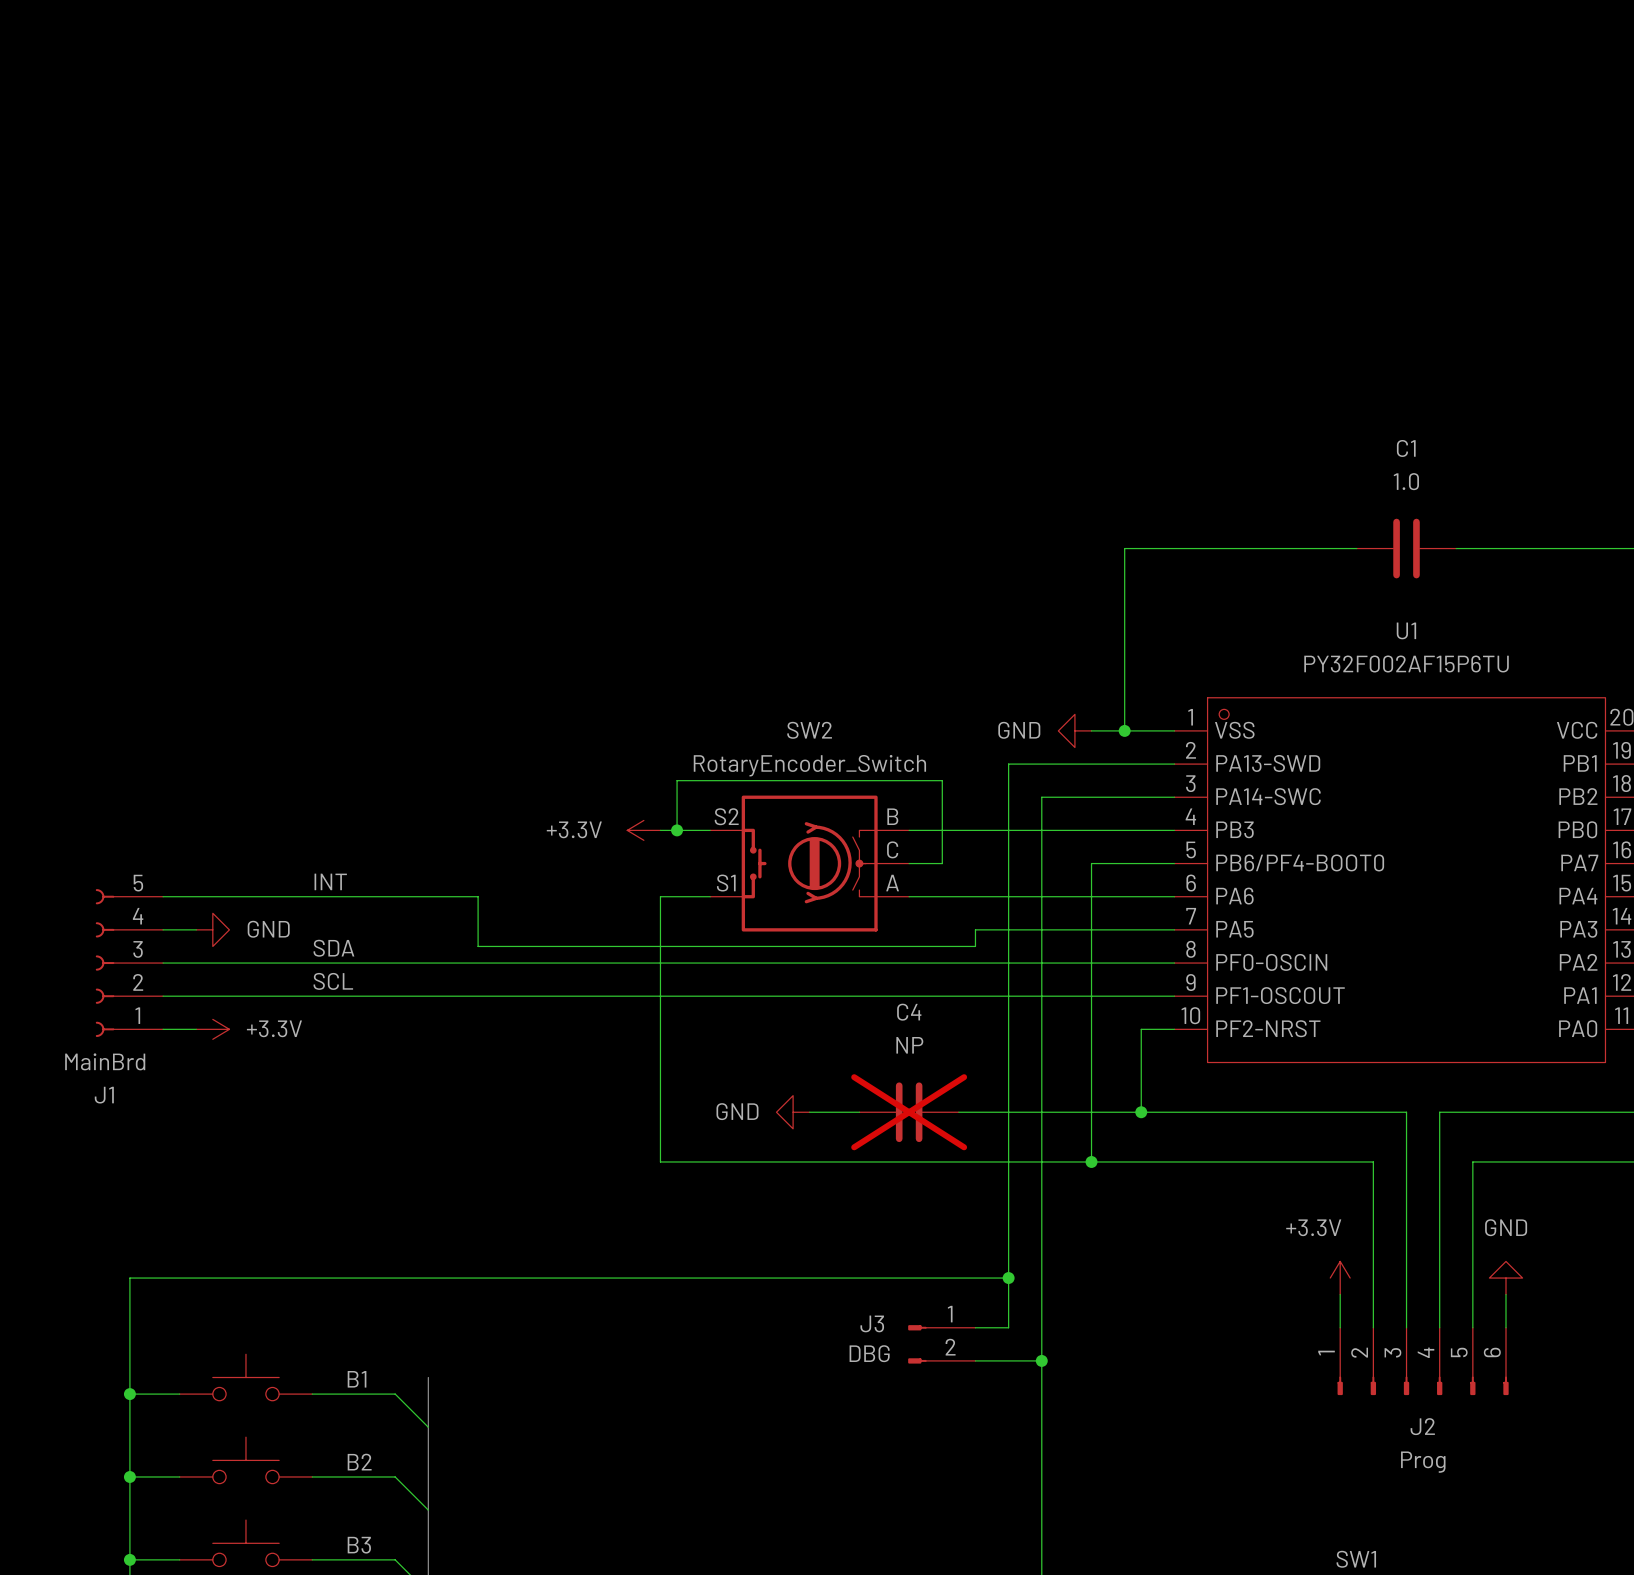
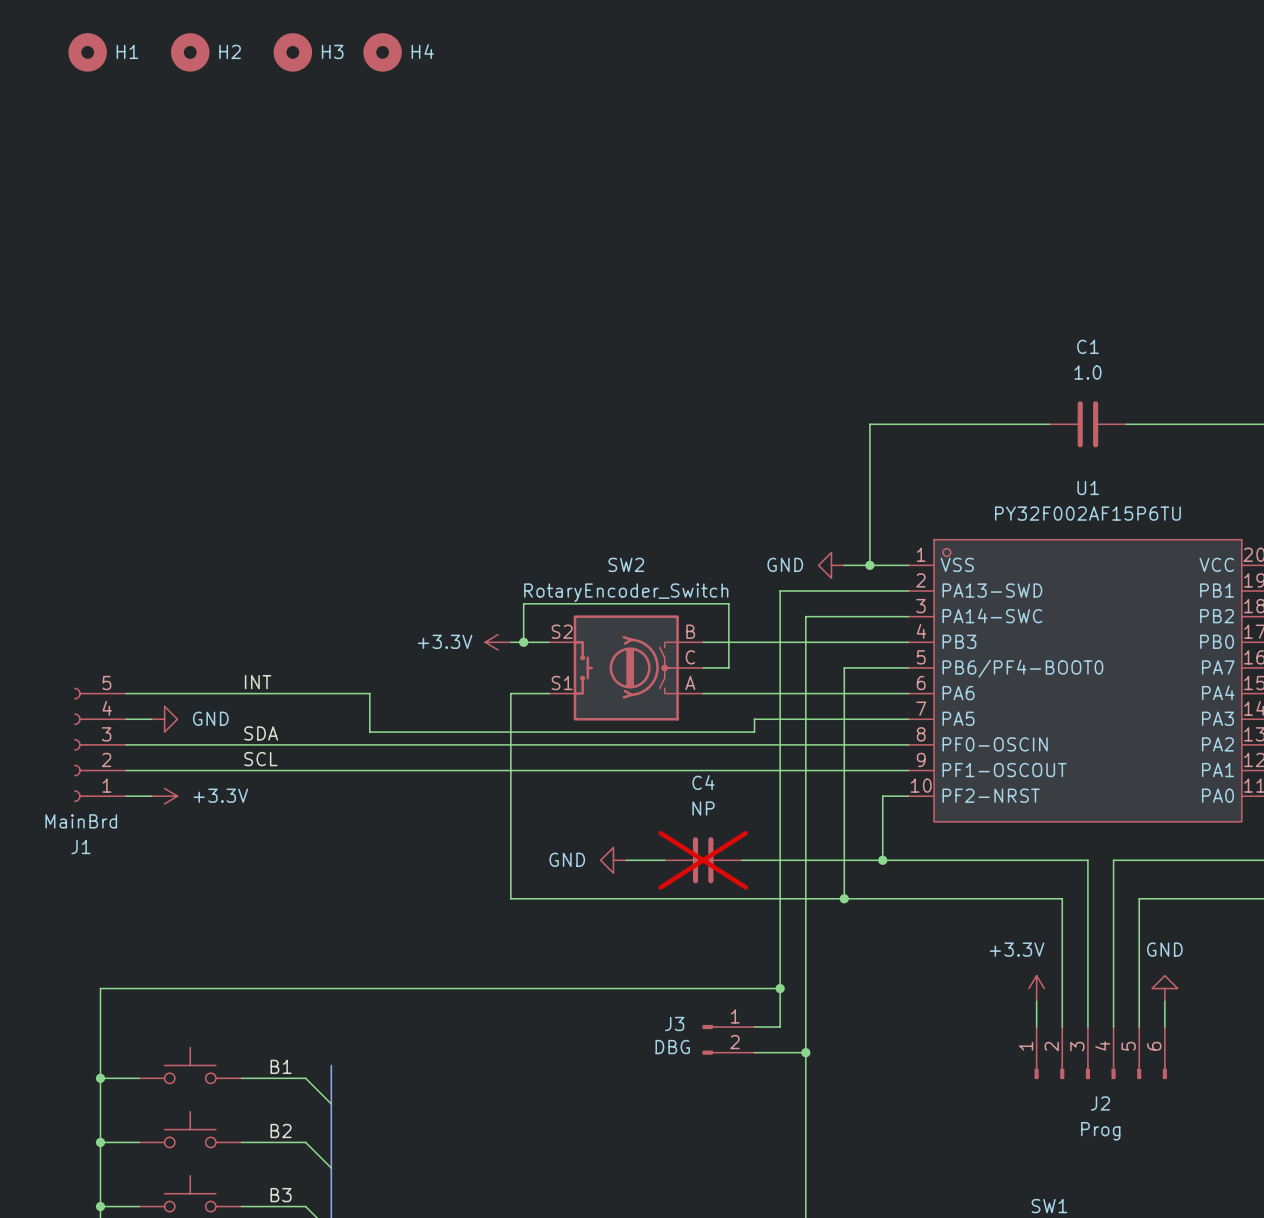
H1: none -> (87, 52)
H2: none -> (190, 52)
H3: none -> (292, 52)
H4: none -> (382, 52)

